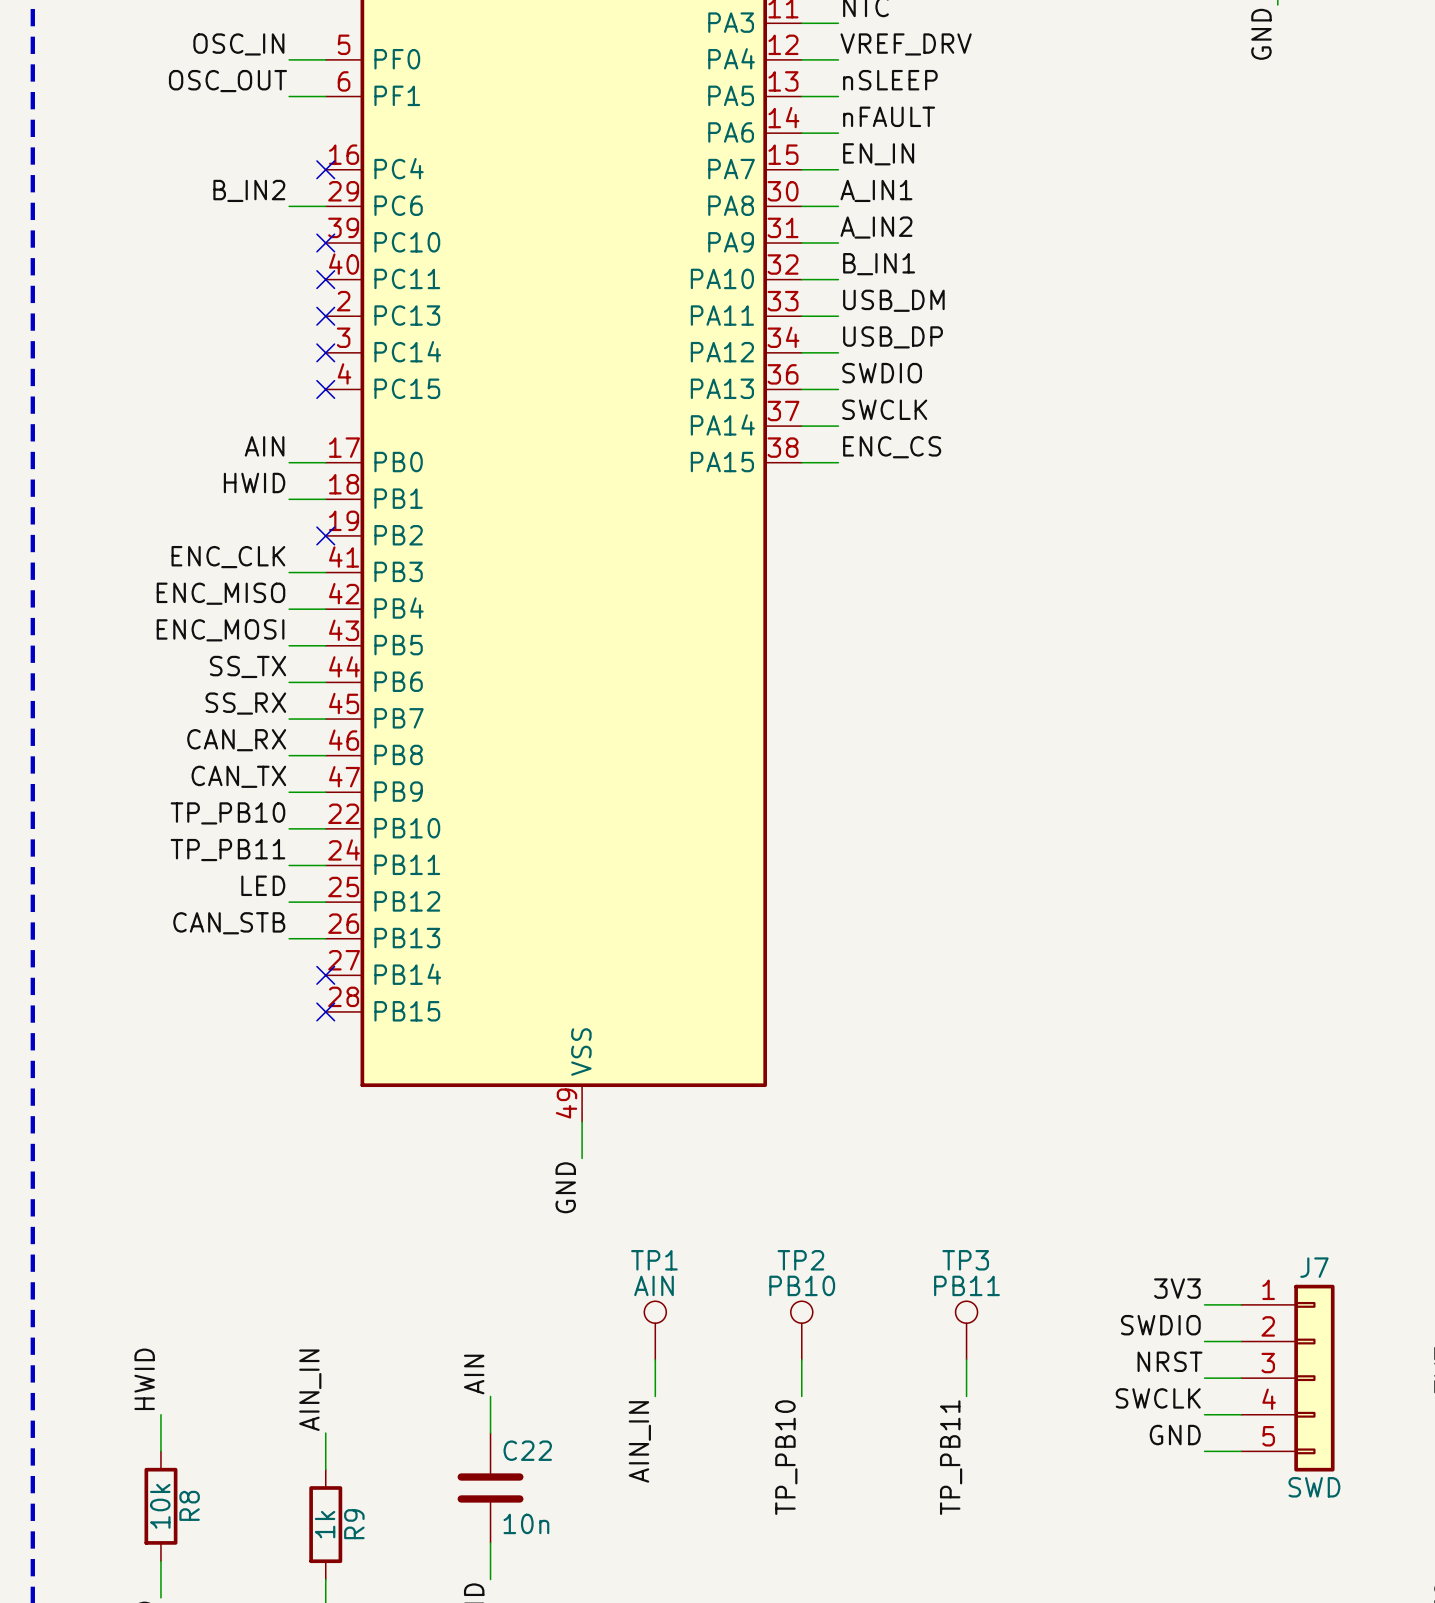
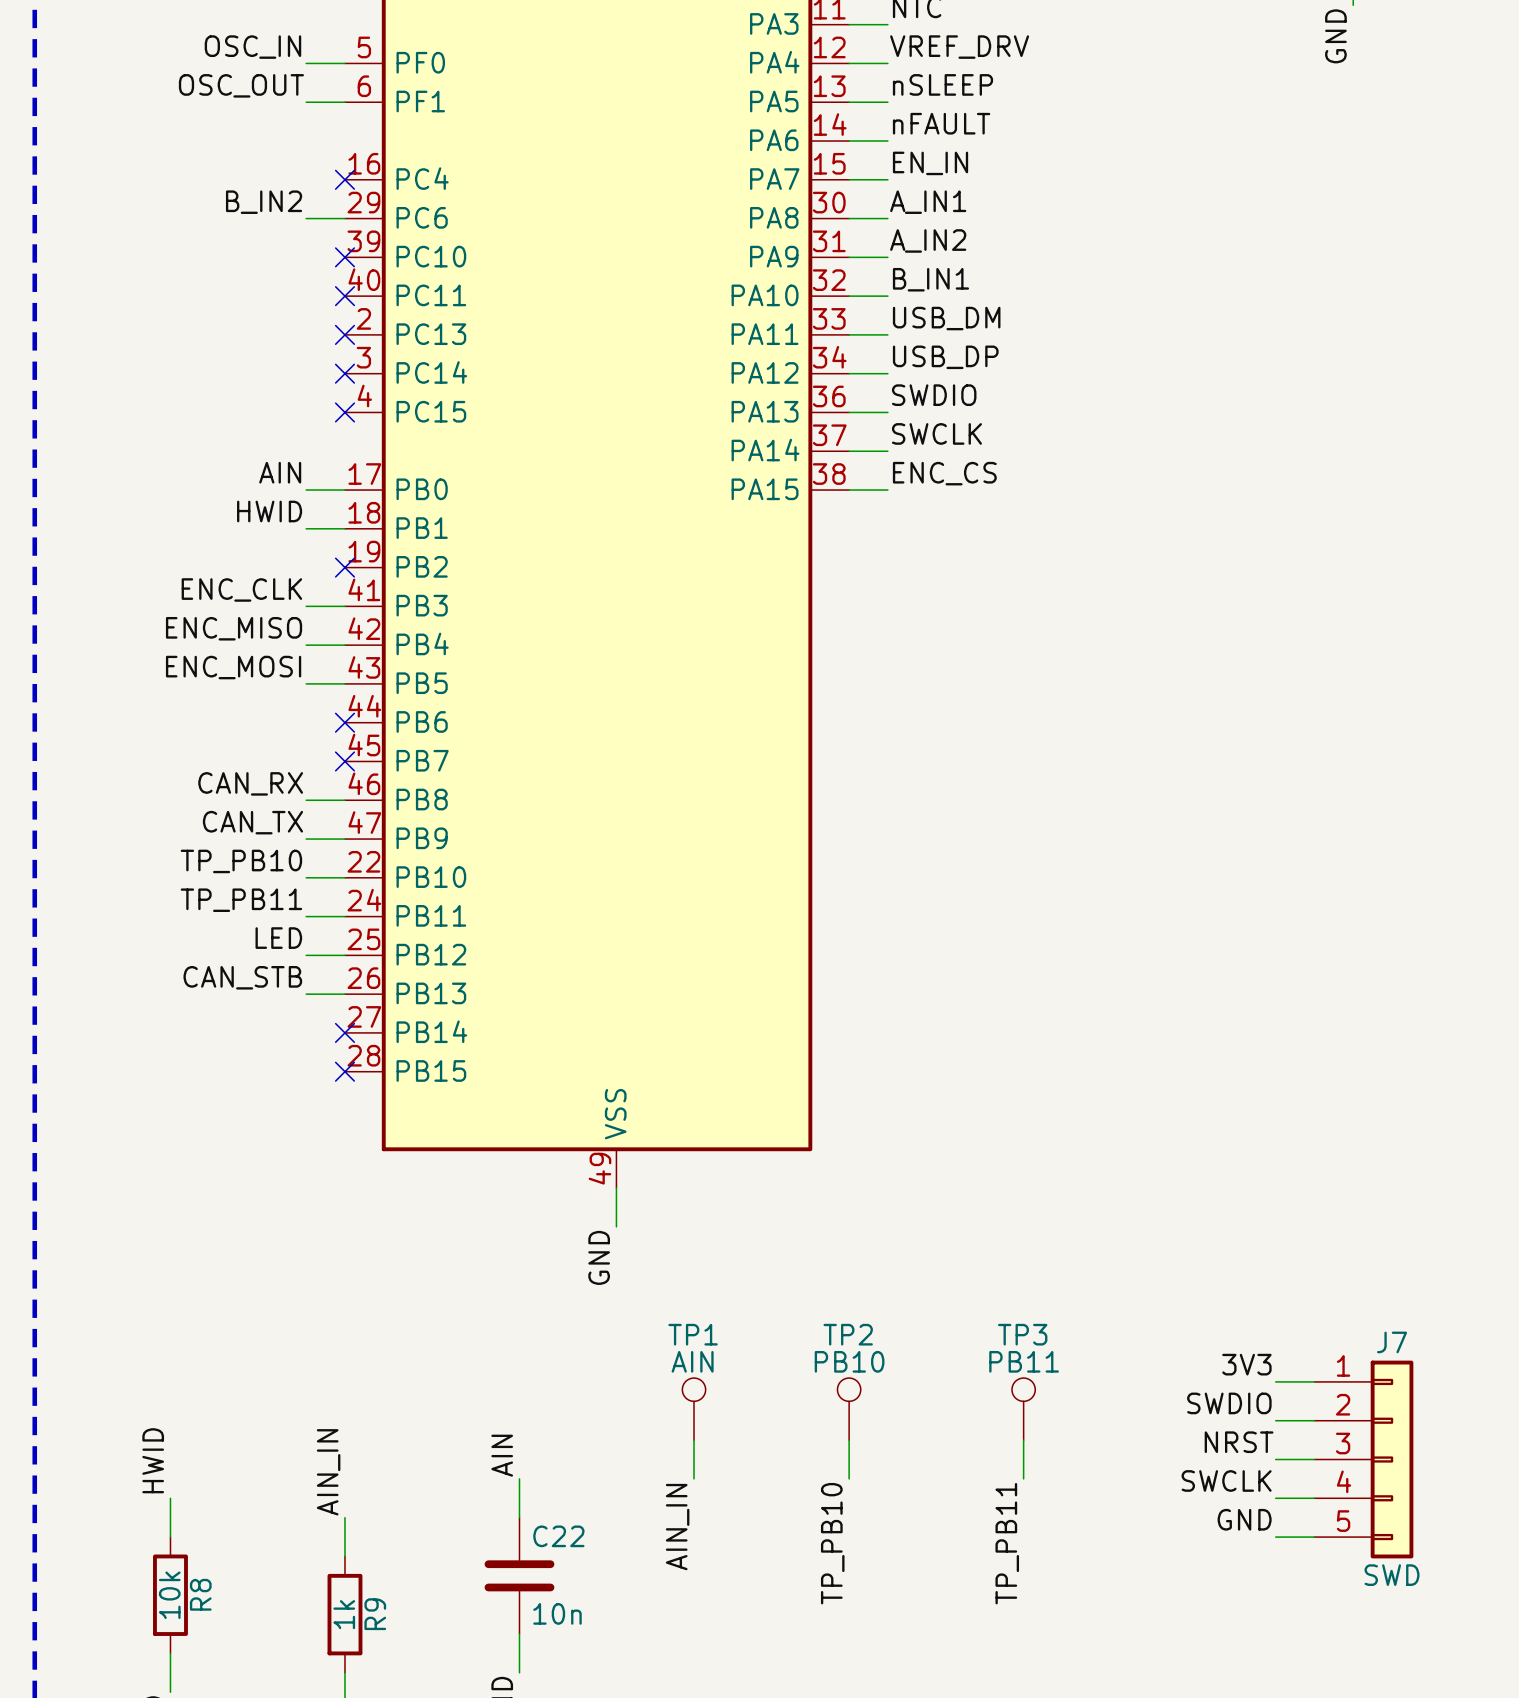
label: SS_TX (248, 666) -> none
wire: (289, 682) (325, 682) -> none
no-connect mark: none -> (344, 722)
label: SS_RX (245, 703) -> none
wire: (289, 719) (325, 719) -> none
no-connect mark: none -> (344, 761)

